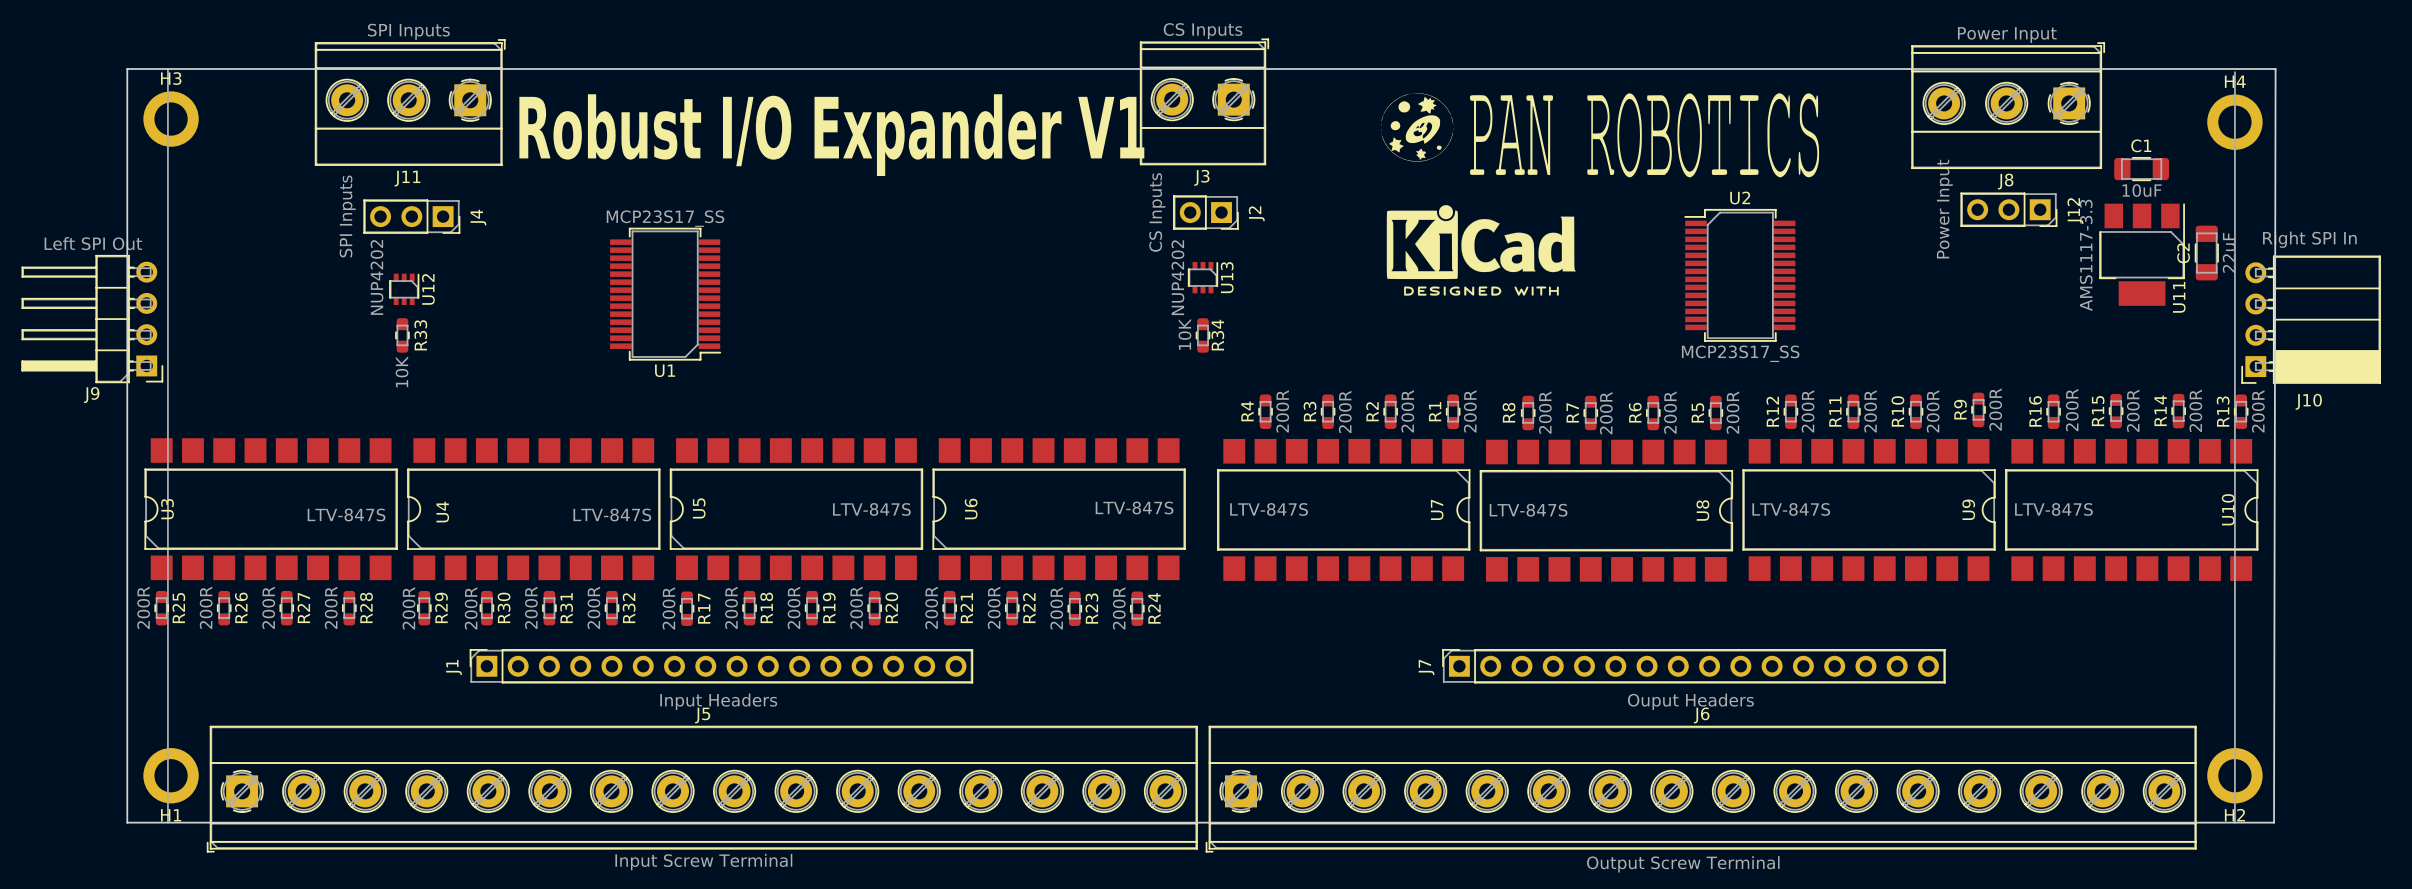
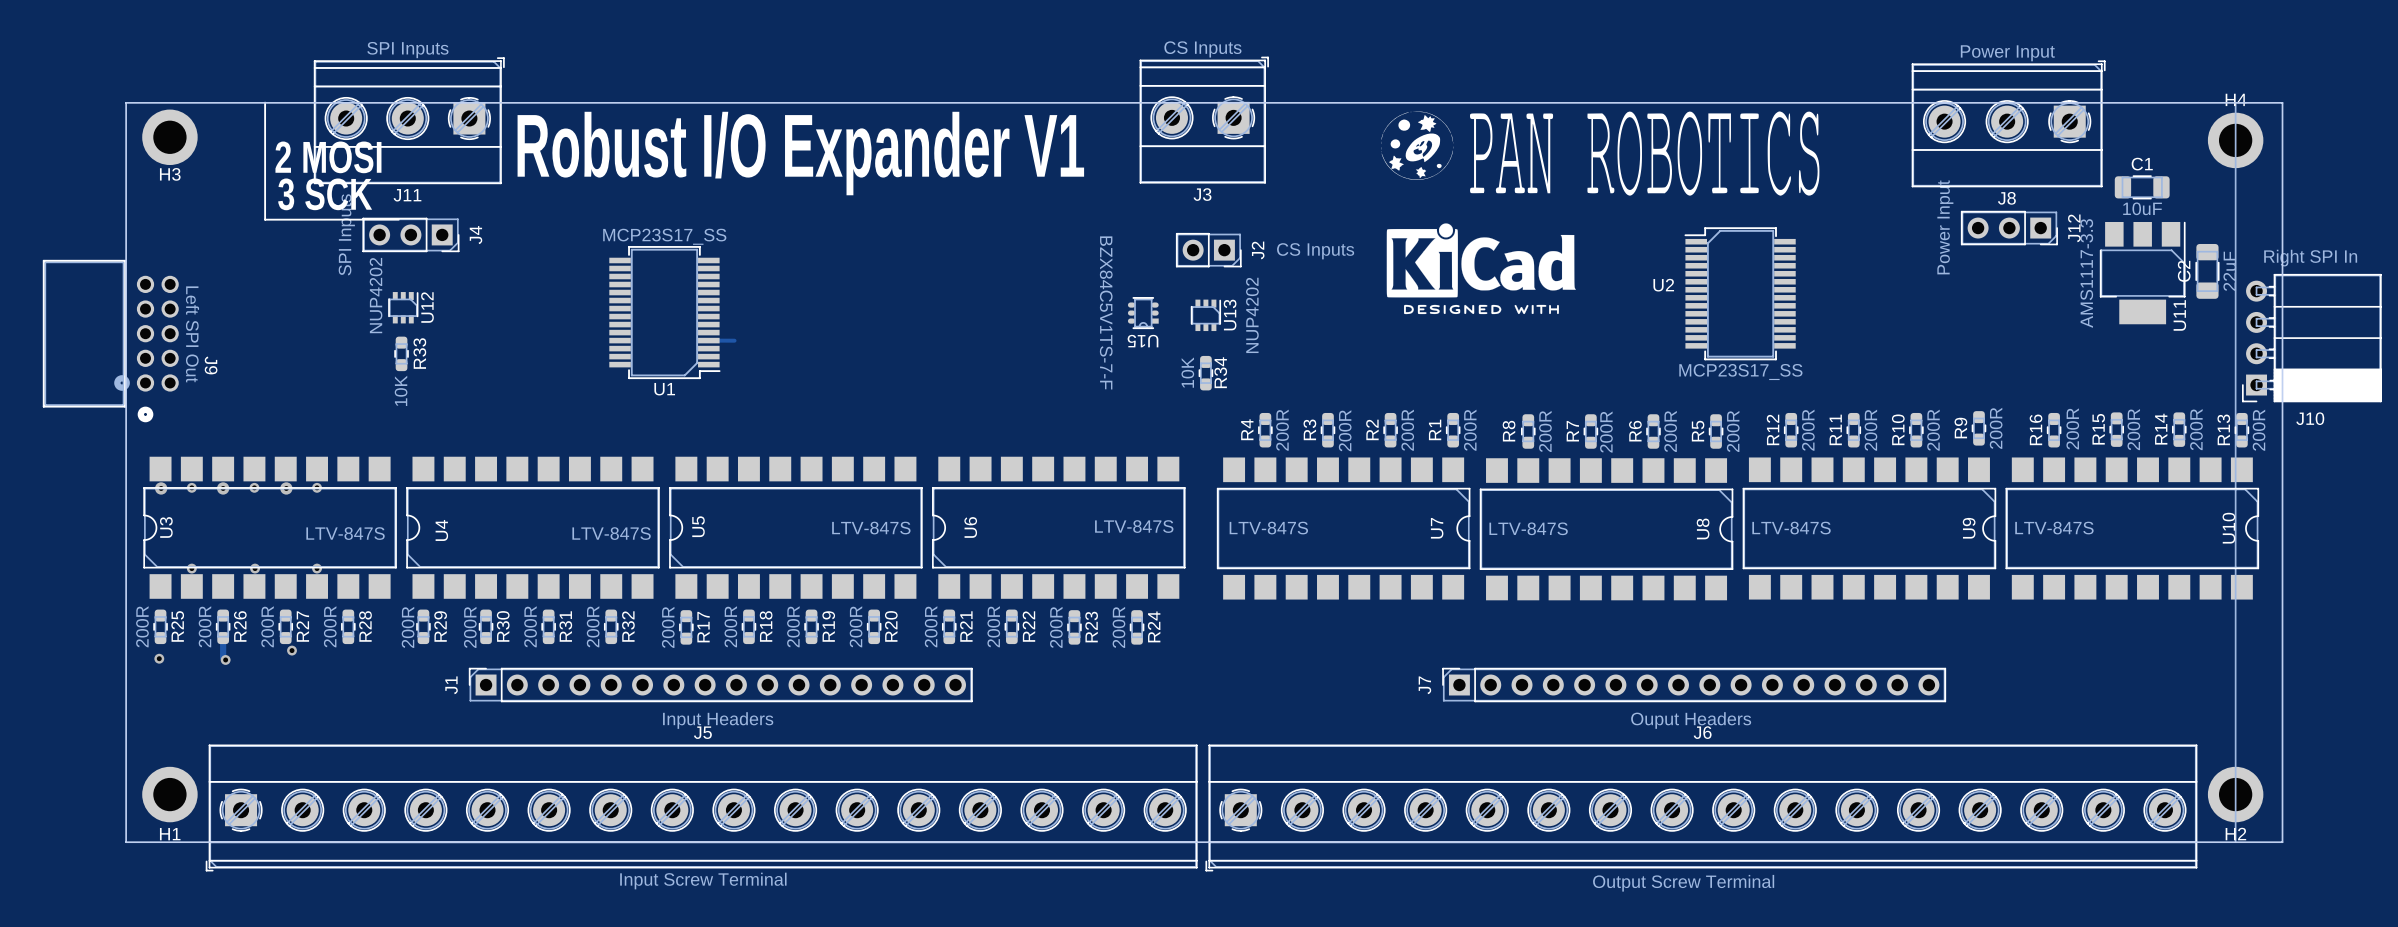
line: (167, 69) (167, 822) -> none
line: (2234, 72) (2234, 84) -> none
H3 name position: H3 (171, 78) -> H3 (170, 174)
board edge: (127, 84) (127, 69) (2275, 69) (2274, 822) (127, 822) -> (126, 102) (2282, 102) (2282, 842) (126, 841)
line: none -> (265, 102) (265, 219) (398, 219)
text: none -> 2 MOSI (328, 157)
text: none -> 3 SCK (325, 194)
U2 name position: U2 (1740, 198) -> U2 (1663, 285)
J2 value rotation: 0° (1157, 212) -> 90° clockwise (1315, 251)
J2 value position: CS Inputs (1157, 212) -> CS Inputs (1315, 251)
J2 position: (1205, 212) -> (1208, 250)
J9 value position: Left SPI Out (93, 243) -> Left SPI Out (192, 334)
J9 footprint: [21, 255, 164, 384] -> [42, 259, 179, 423]
U13 value position: NUP4202 (1177, 277) -> NUP4202 (1252, 315)
U13 position: (1203, 277) -> (1205, 315)
U15: none -> BZX84C5V1TS-7-F (1143, 313)
track: none -> (708, 340) (734, 340)
R34 position: (1203, 335) -> (1205, 373)
J9 name position: J9 (91, 395) -> J9 (211, 365)
via: none -> (161, 488)
via: none -> (191, 487)
via: none -> (223, 488)
via: none -> (254, 487)
via: none -> (286, 488)
via: none -> (317, 487)
via: none -> (191, 568)
via: none -> (255, 568)
via: none -> (317, 568)
track: none -> (223, 638) (223, 657) (225, 659)
via: none -> (291, 650)
via: none -> (159, 658)
via: none -> (225, 659)

